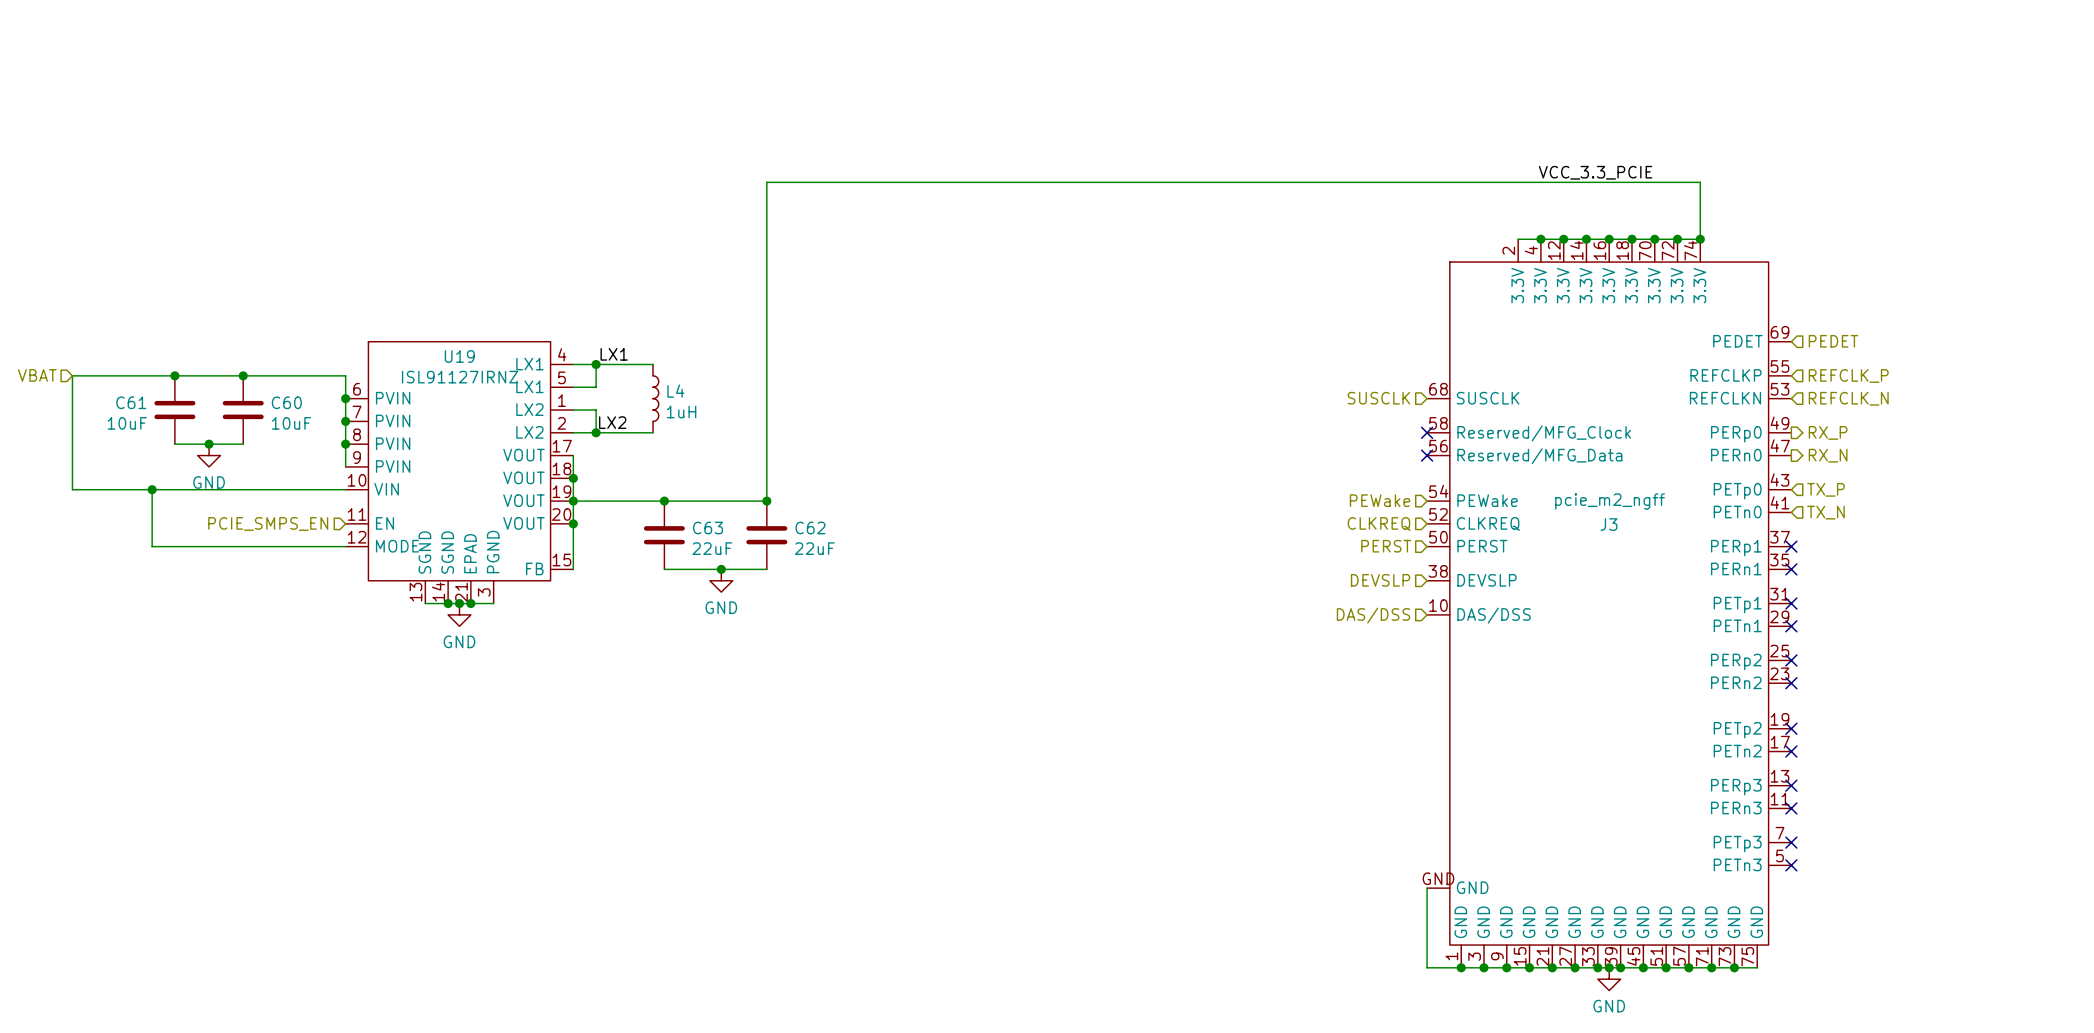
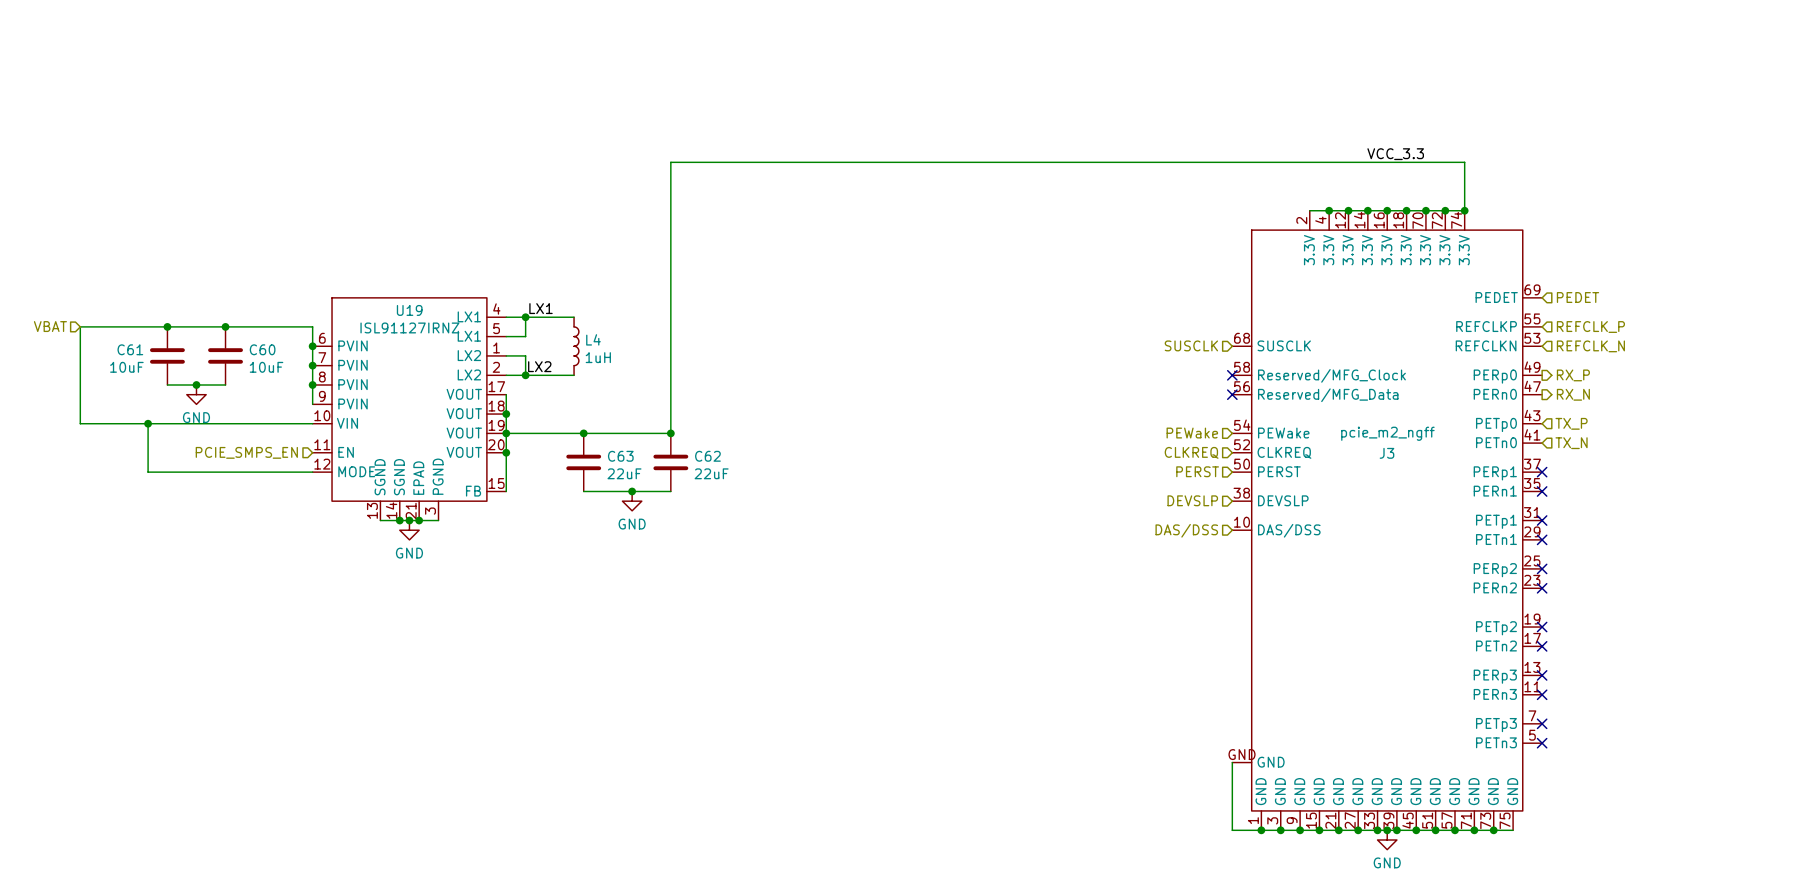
label: VCC_3.3_PCIE (1595, 172) -> VCC_3.3 (1395, 154)

